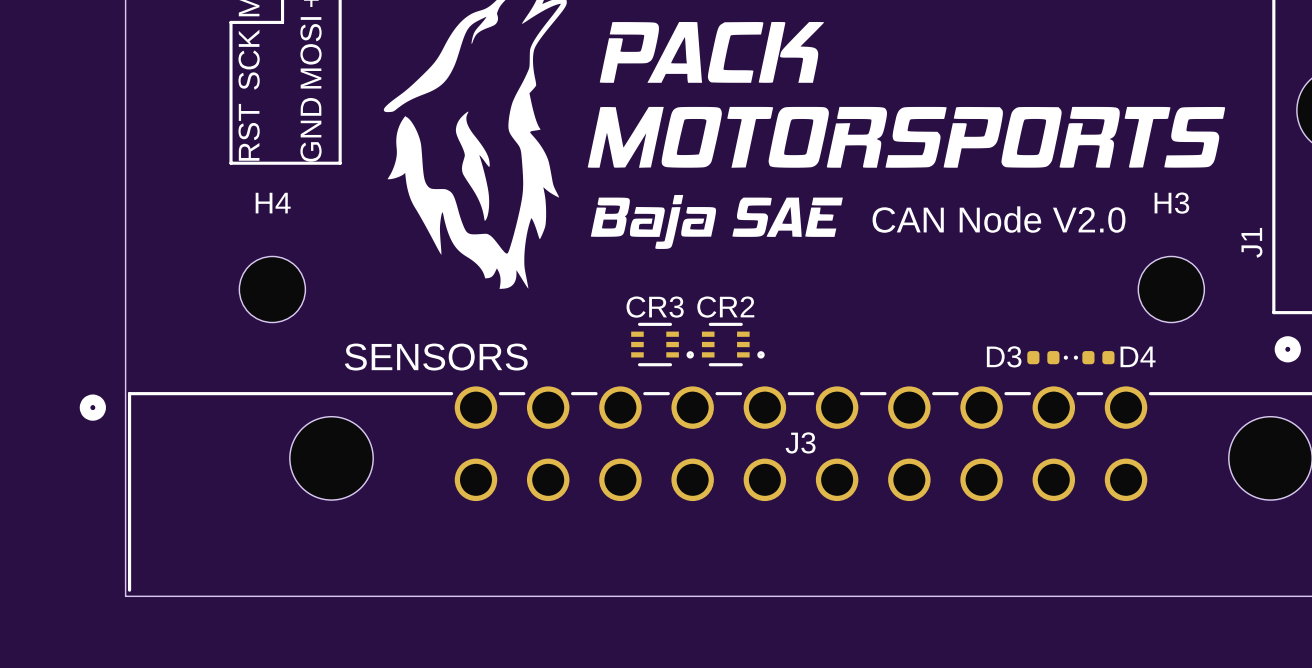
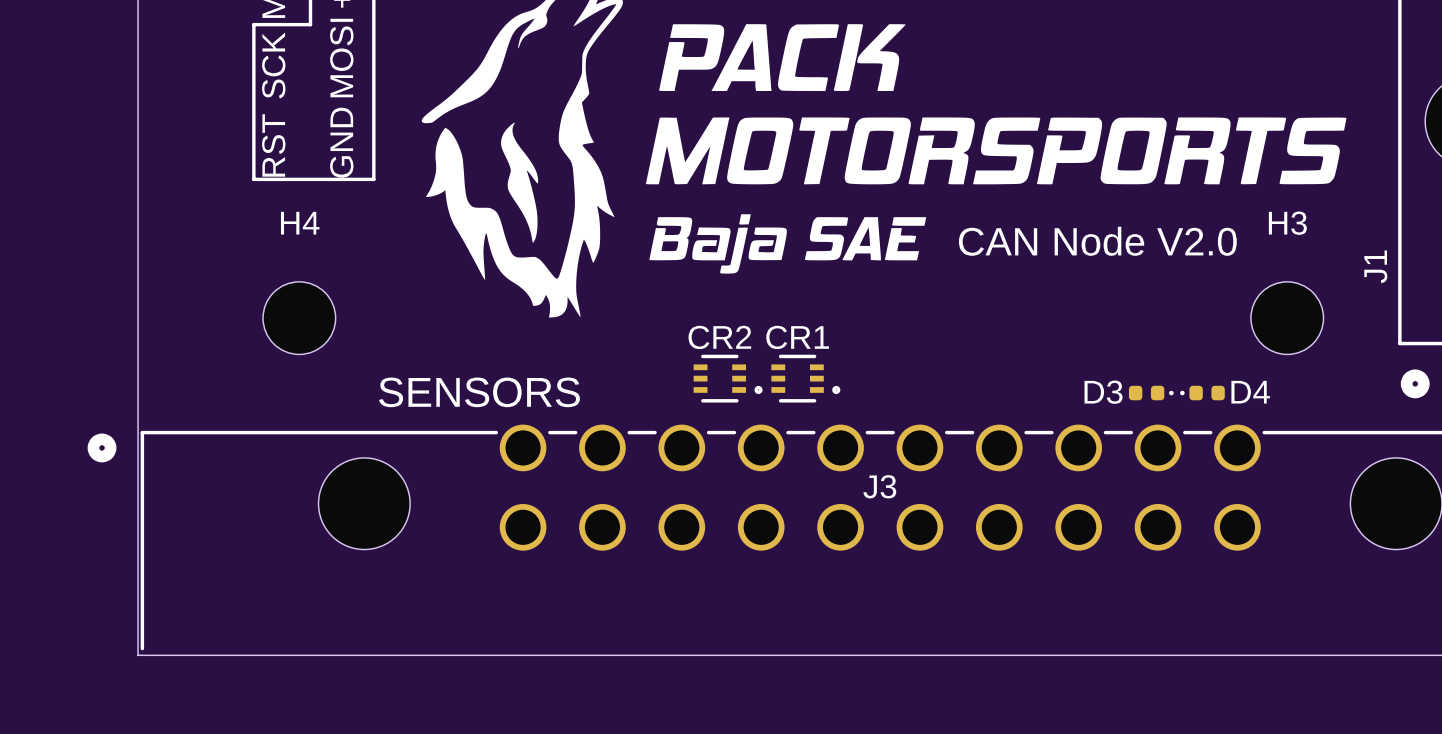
CR3 name: CR3 (655, 307) -> CR2 (719, 337)
CR2 name: CR2 (725, 307) -> CR1 (797, 337)

